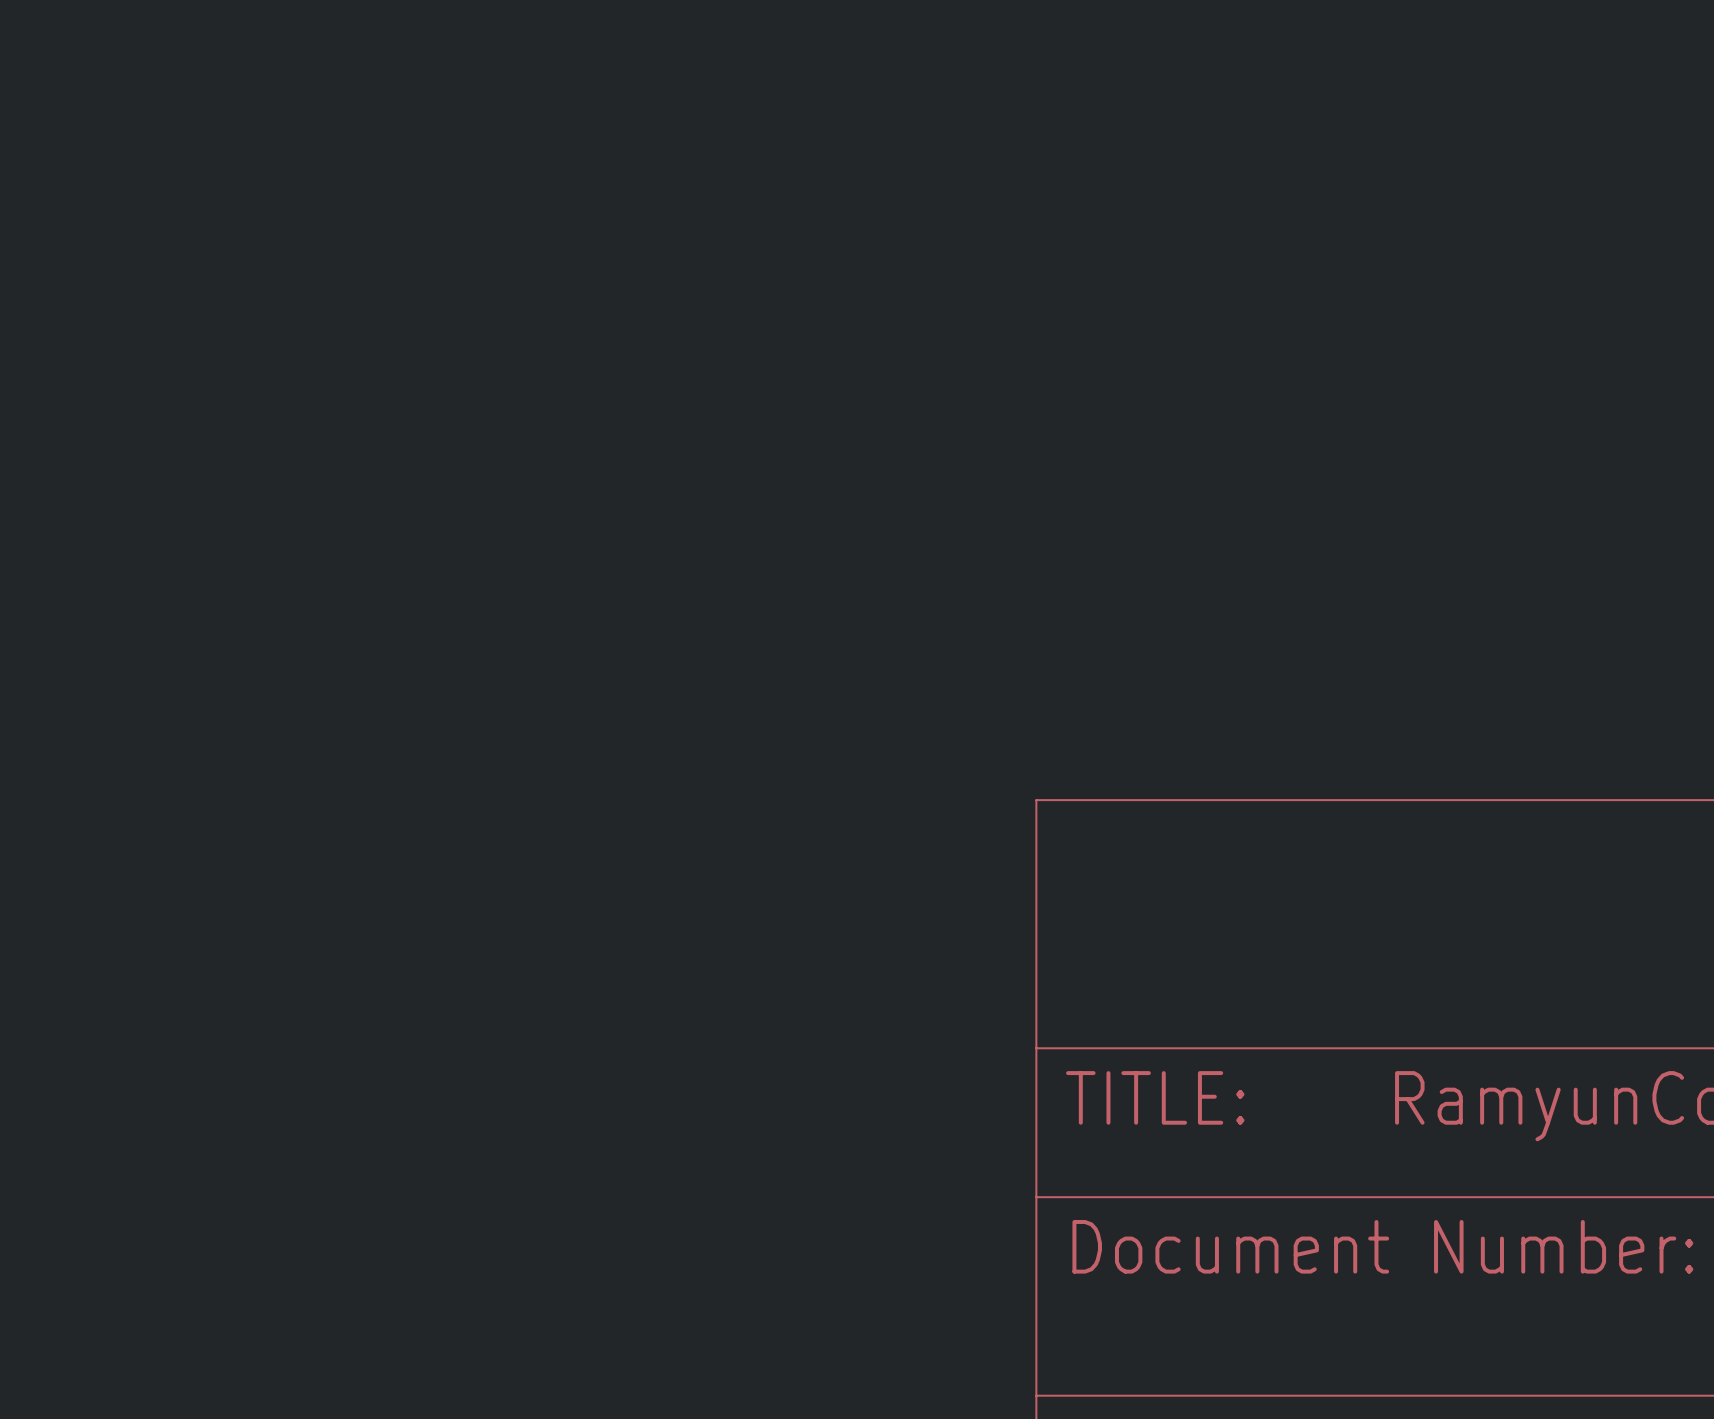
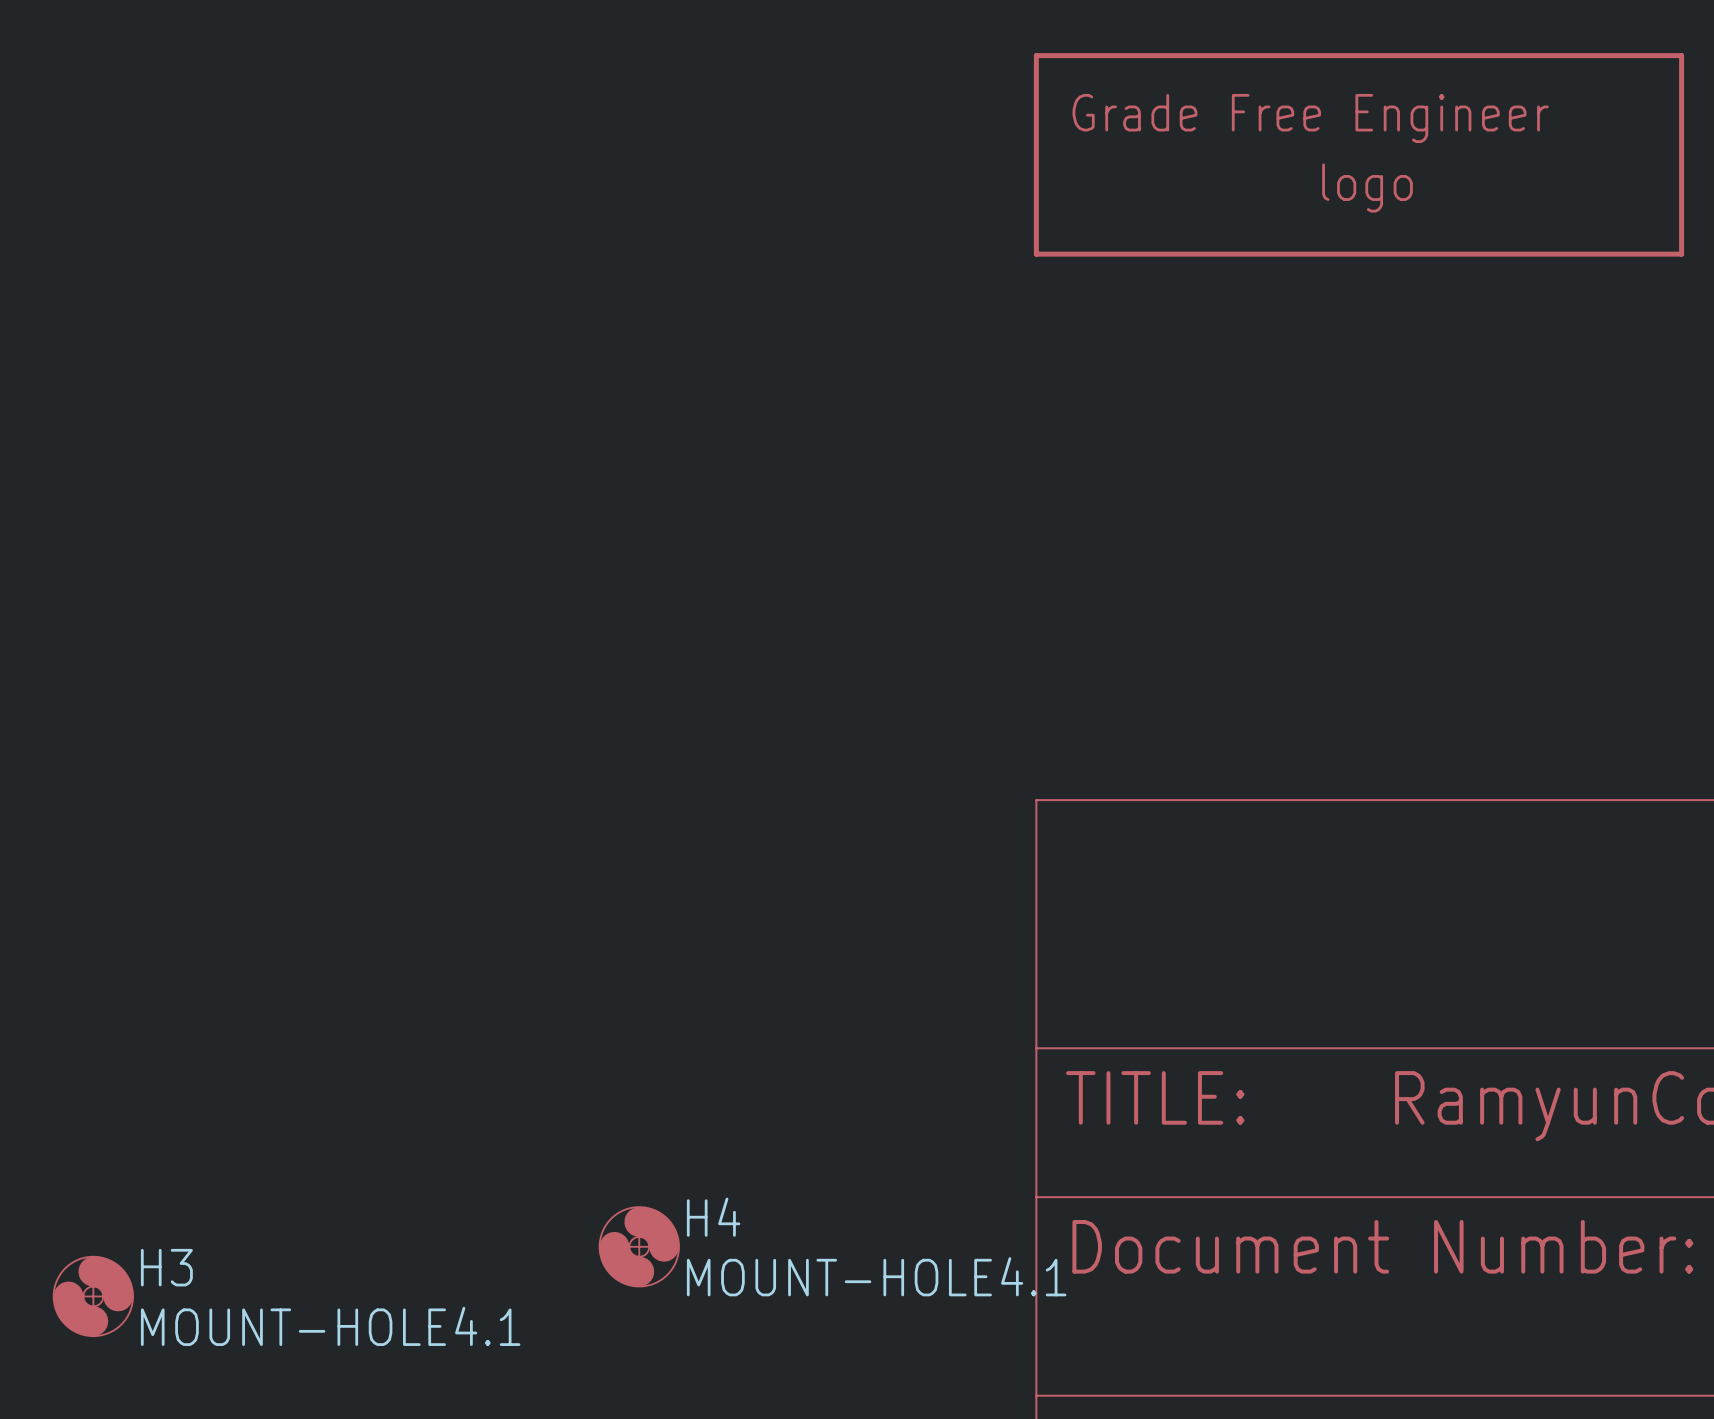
part: none -> (1358, 154)
H4: none -> MOUNT-HOLE4.1 (639, 1246)
H3: none -> MOUNT-HOLE4.1 (93, 1296)

